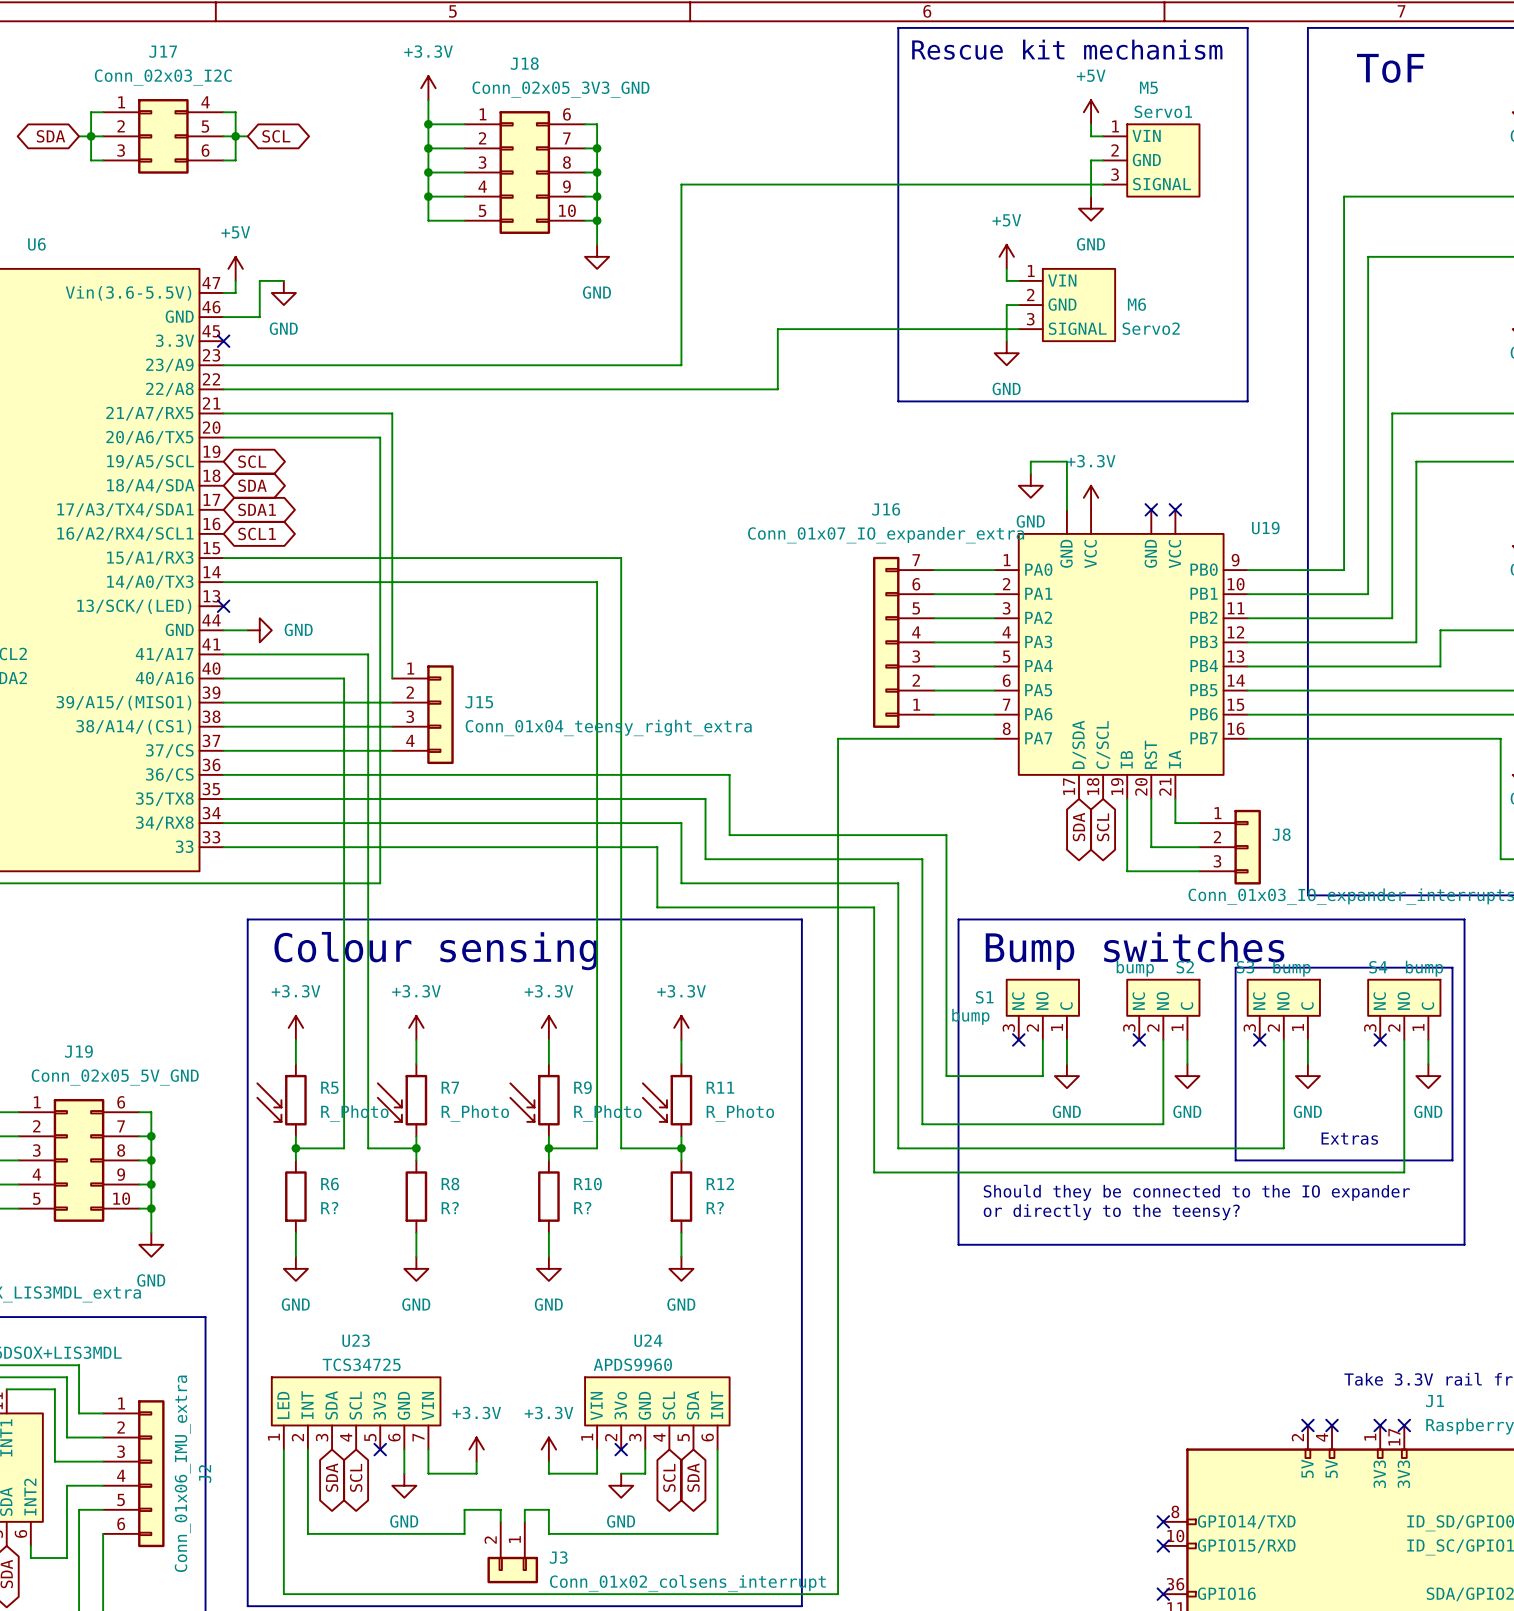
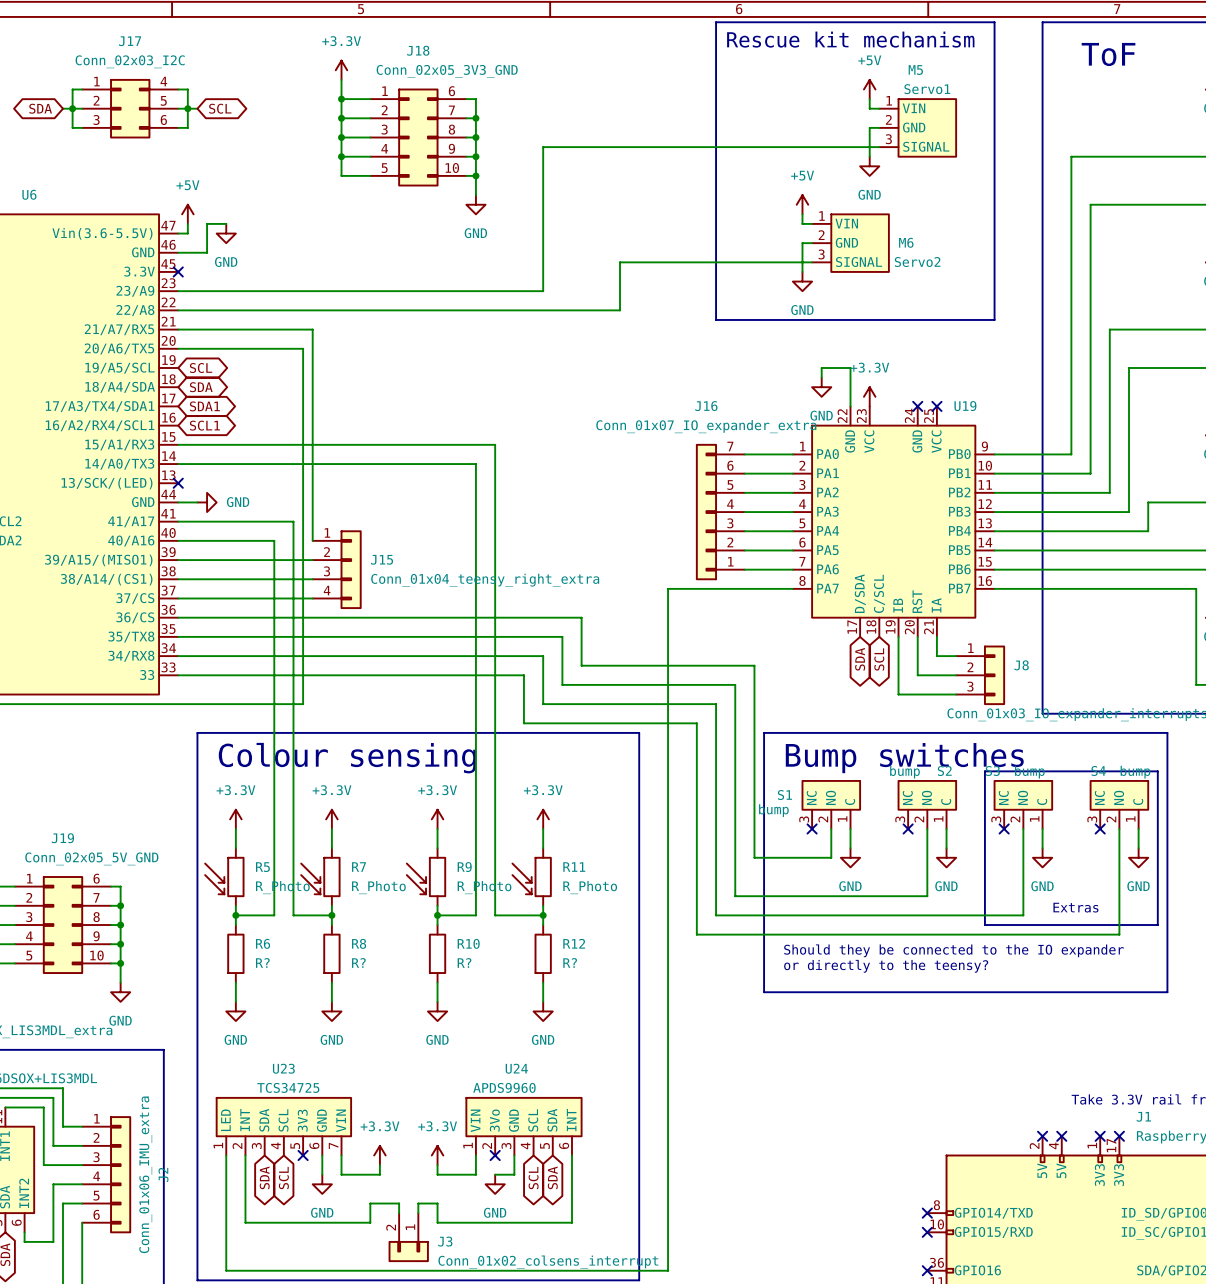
U19 pin number: none -> 22 (842, 416)
U19 pin number: none -> 23 (861, 416)
U19 pin number: none -> 24 (909, 415)
U19 pin number: none -> 25 (929, 416)
U19 name position: U19 (1265, 528) -> U19 (965, 406)

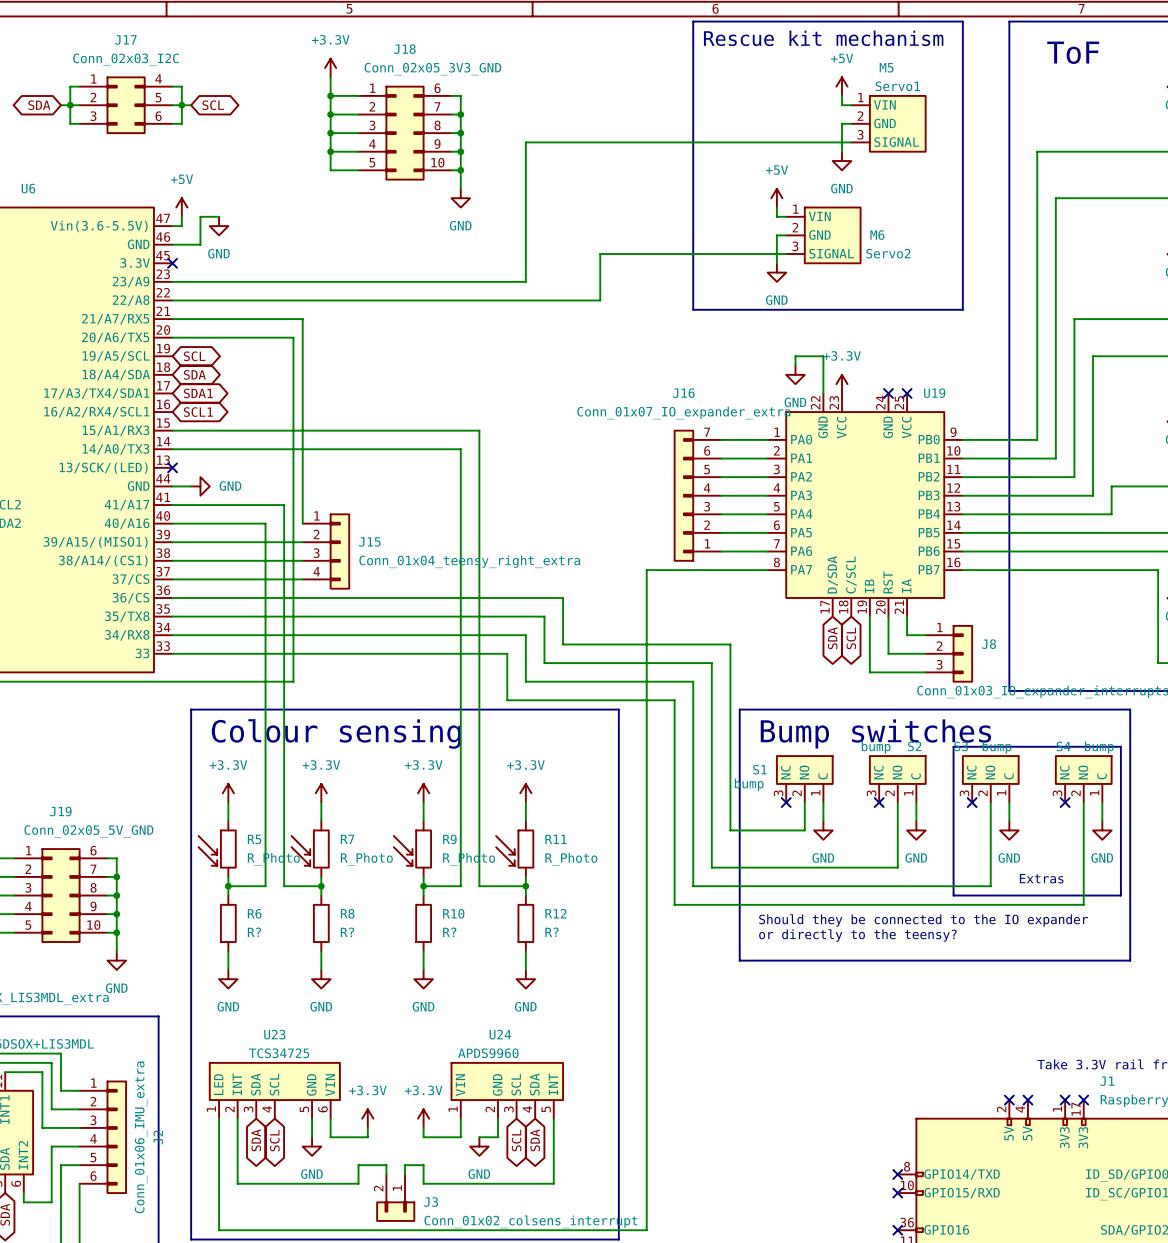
U23 symbol: [216, 1097, 352, 1156] -> [209, 1062, 340, 1119]
U24 symbol: [466, 1097, 582, 1156] -> [451, 1062, 564, 1119]
no-connect mark: (303, 1155) -> none
no-connect mark: (495, 1155) -> none

